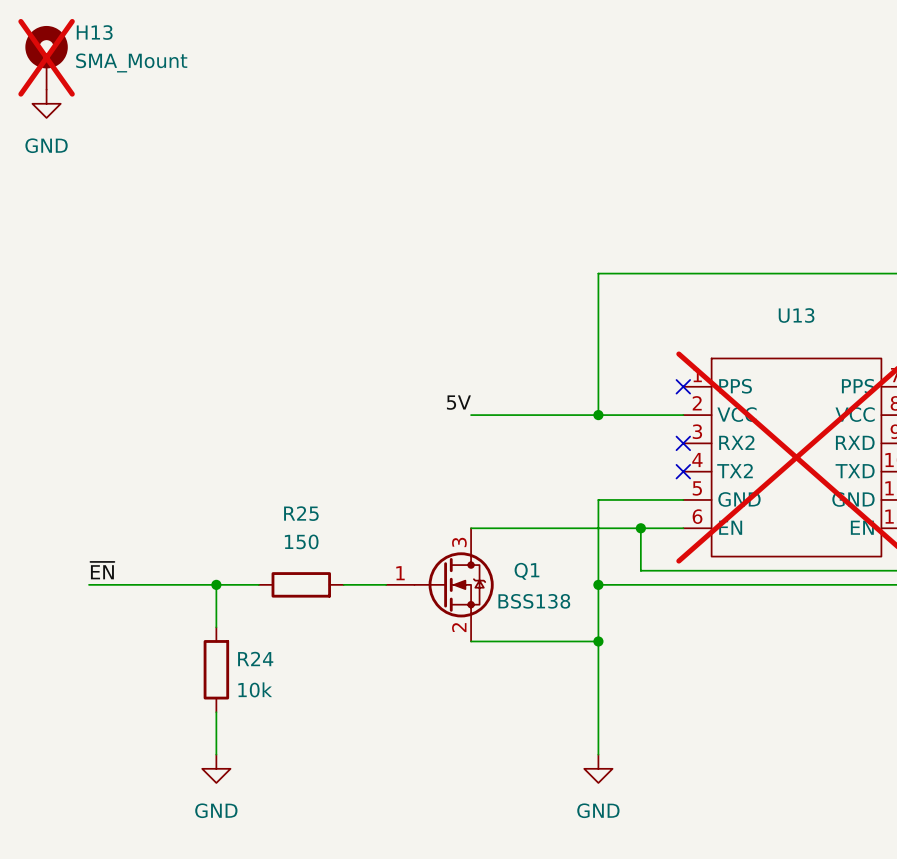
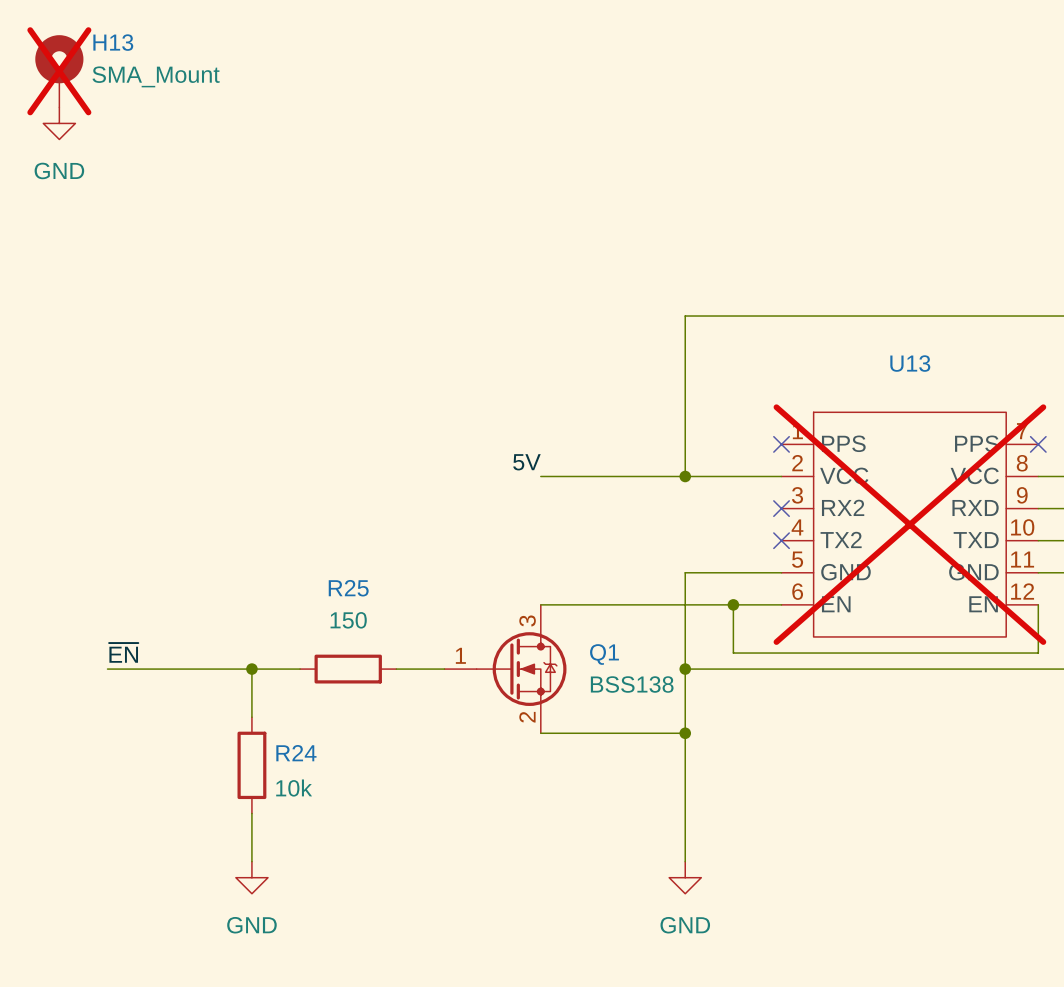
Q1 value position: BSS138 (534, 601) -> BSS138 (632, 684)

